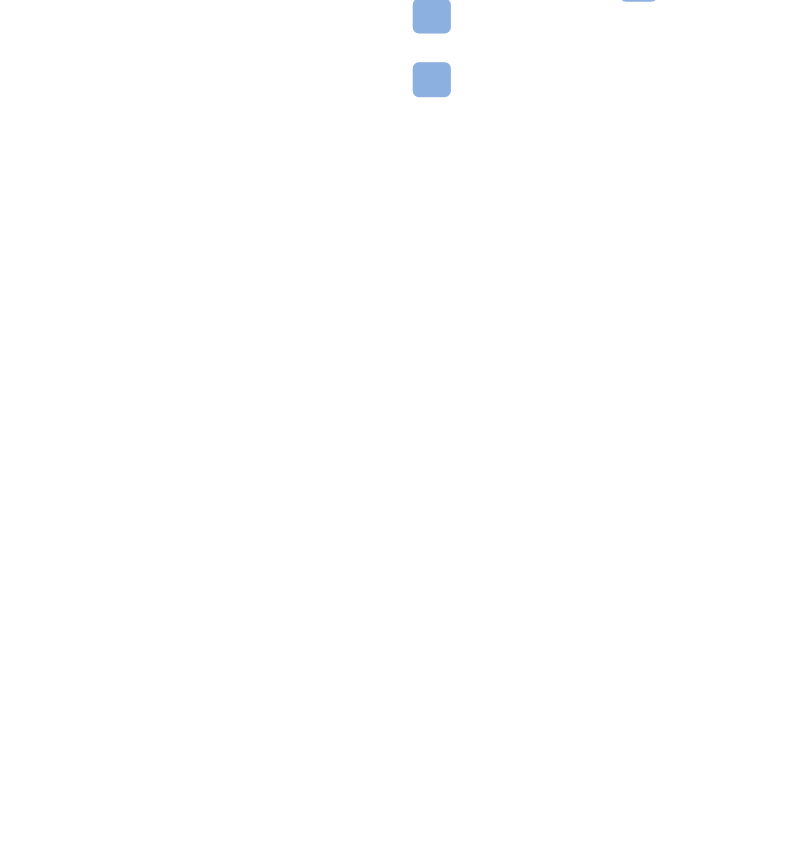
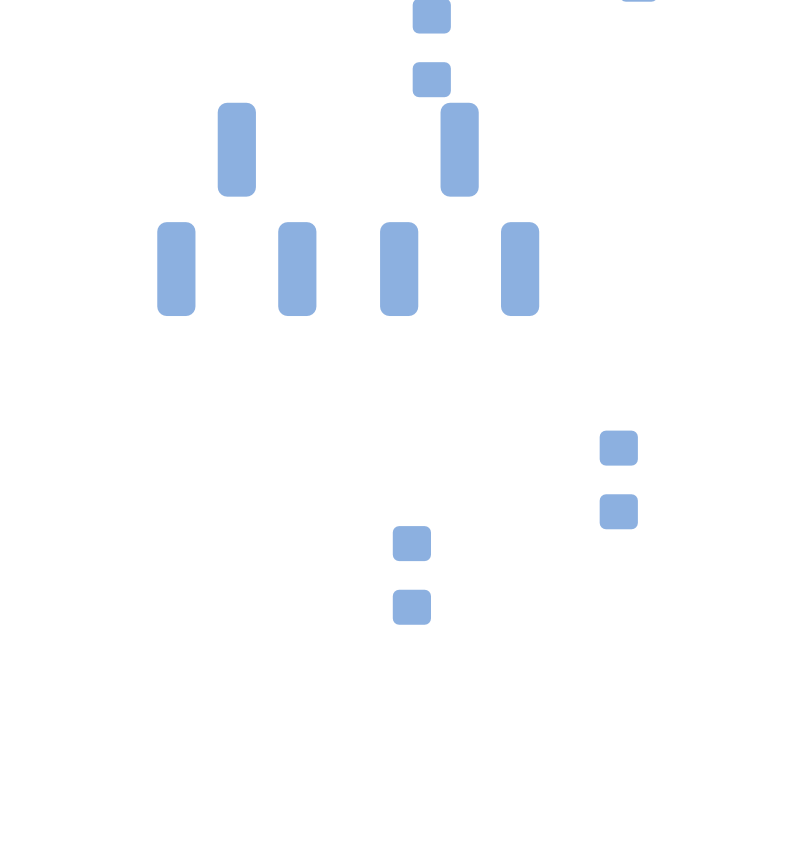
part: none -> (236, 209)
part: none -> (459, 209)
part: none -> (618, 479)
part: none -> (411, 575)

